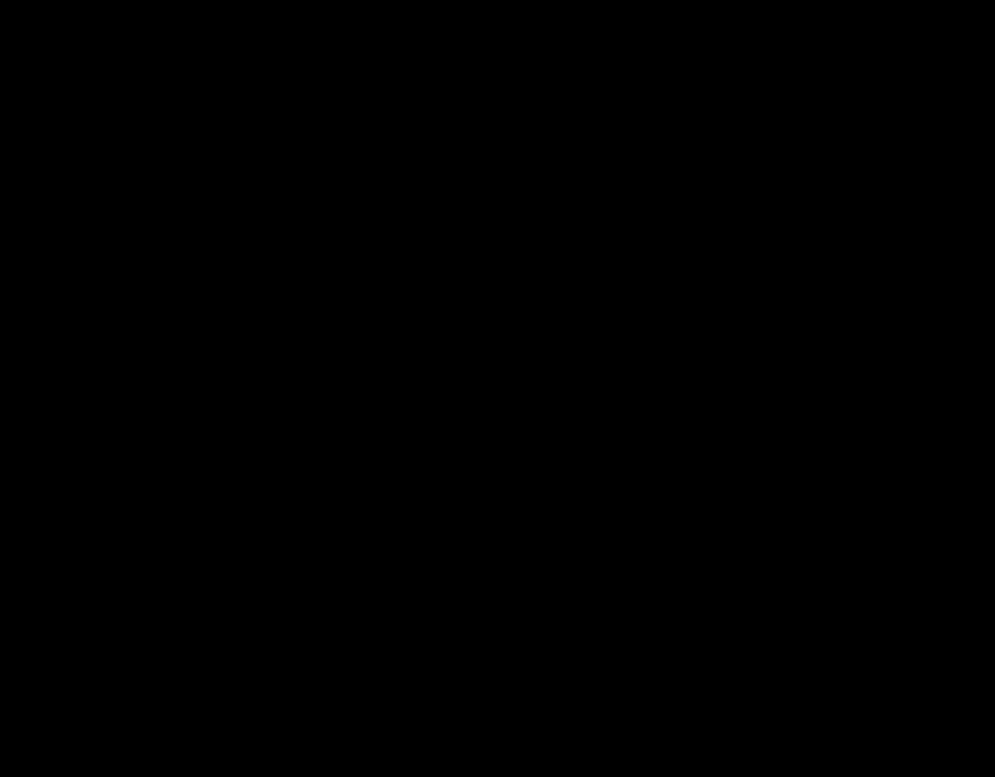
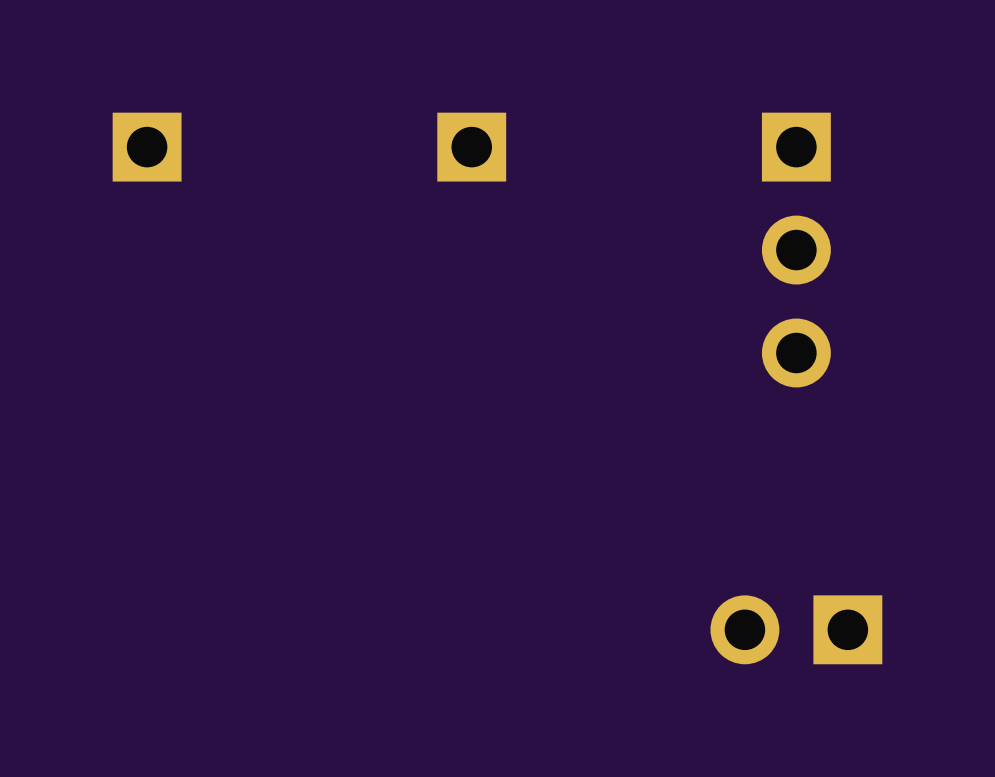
part: none -> (147, 147)
part: none -> (471, 147)
part: none -> (796, 250)
part: none -> (796, 629)

